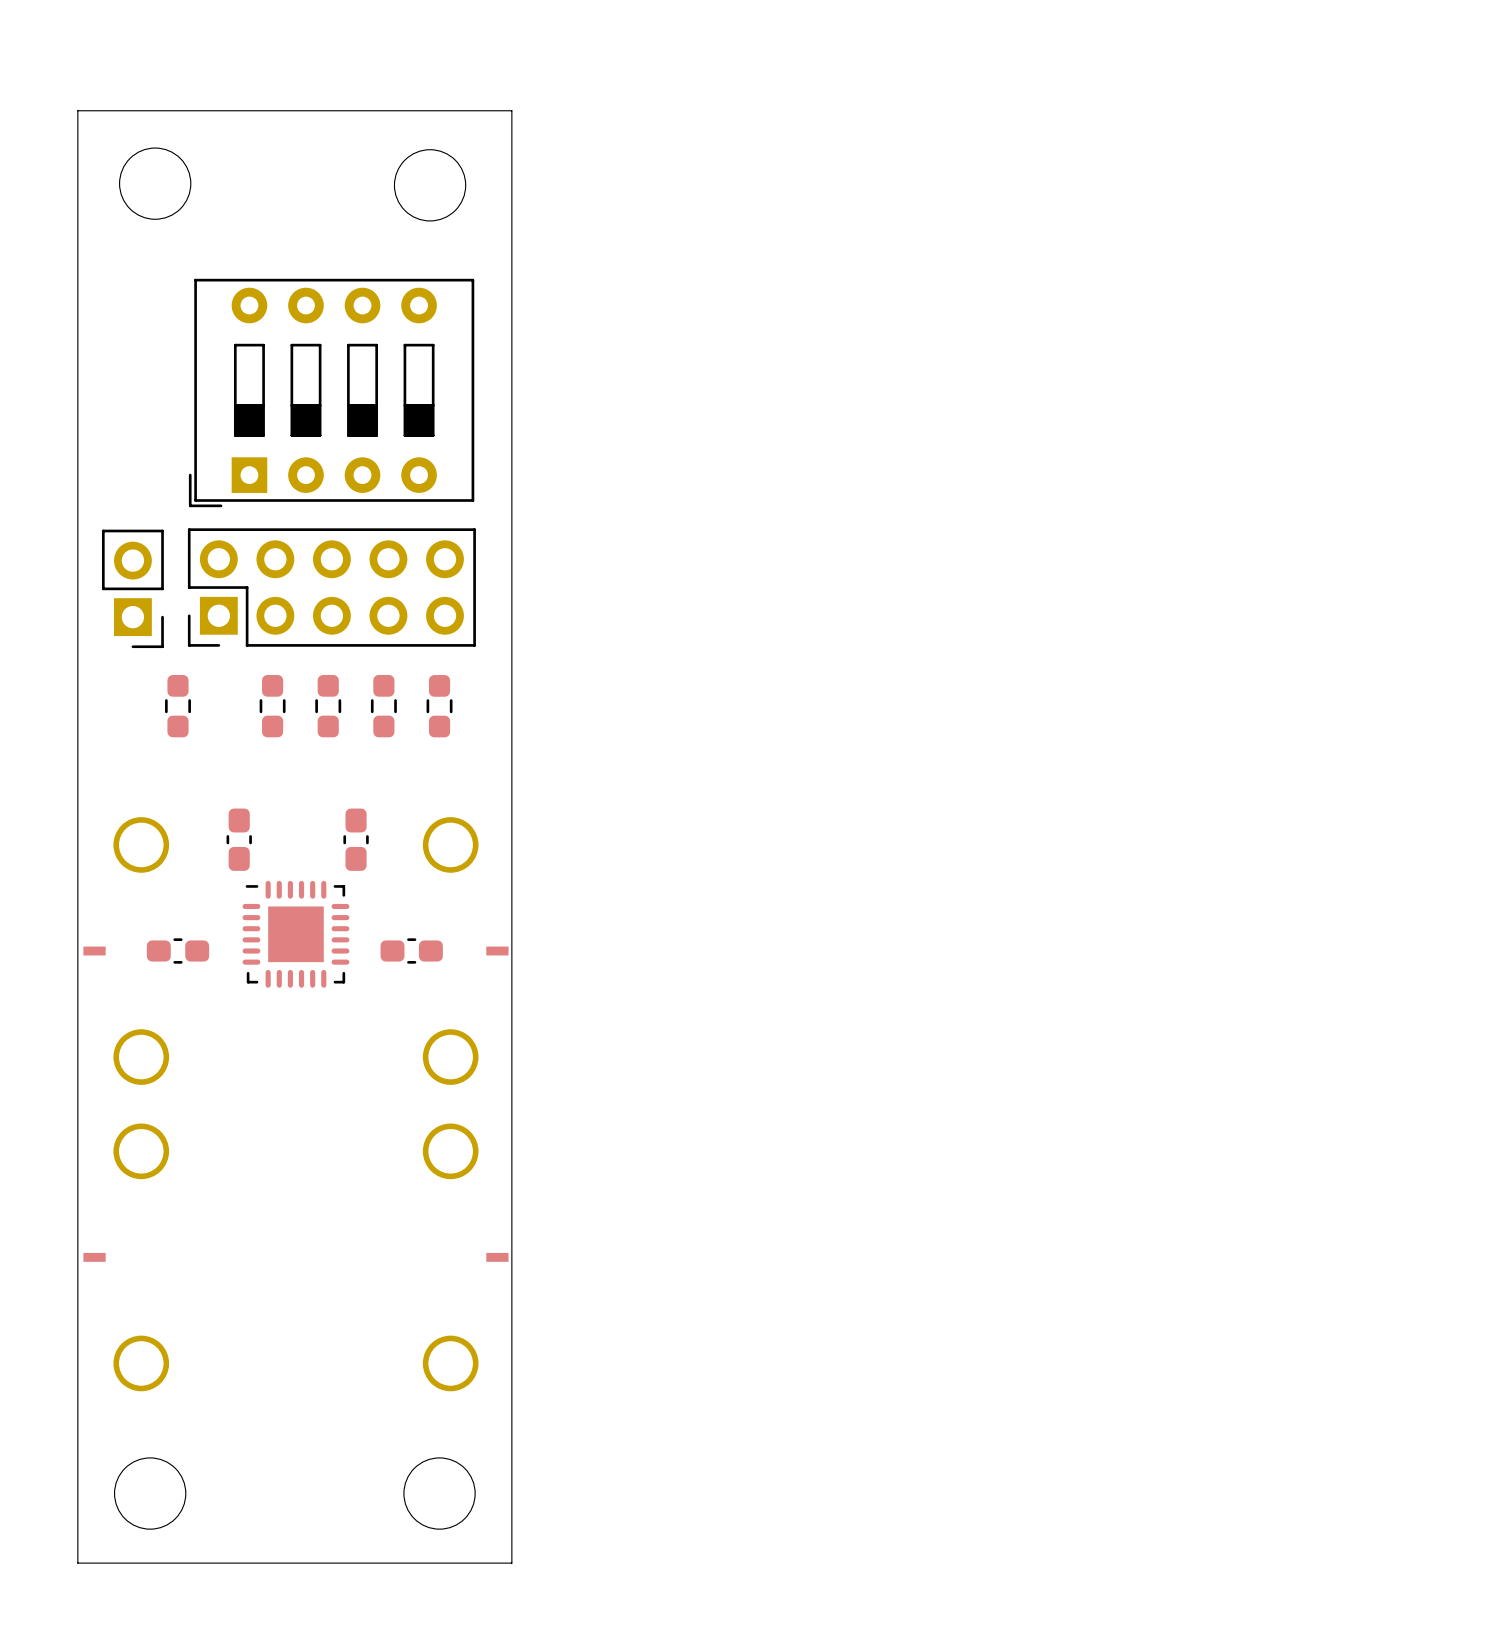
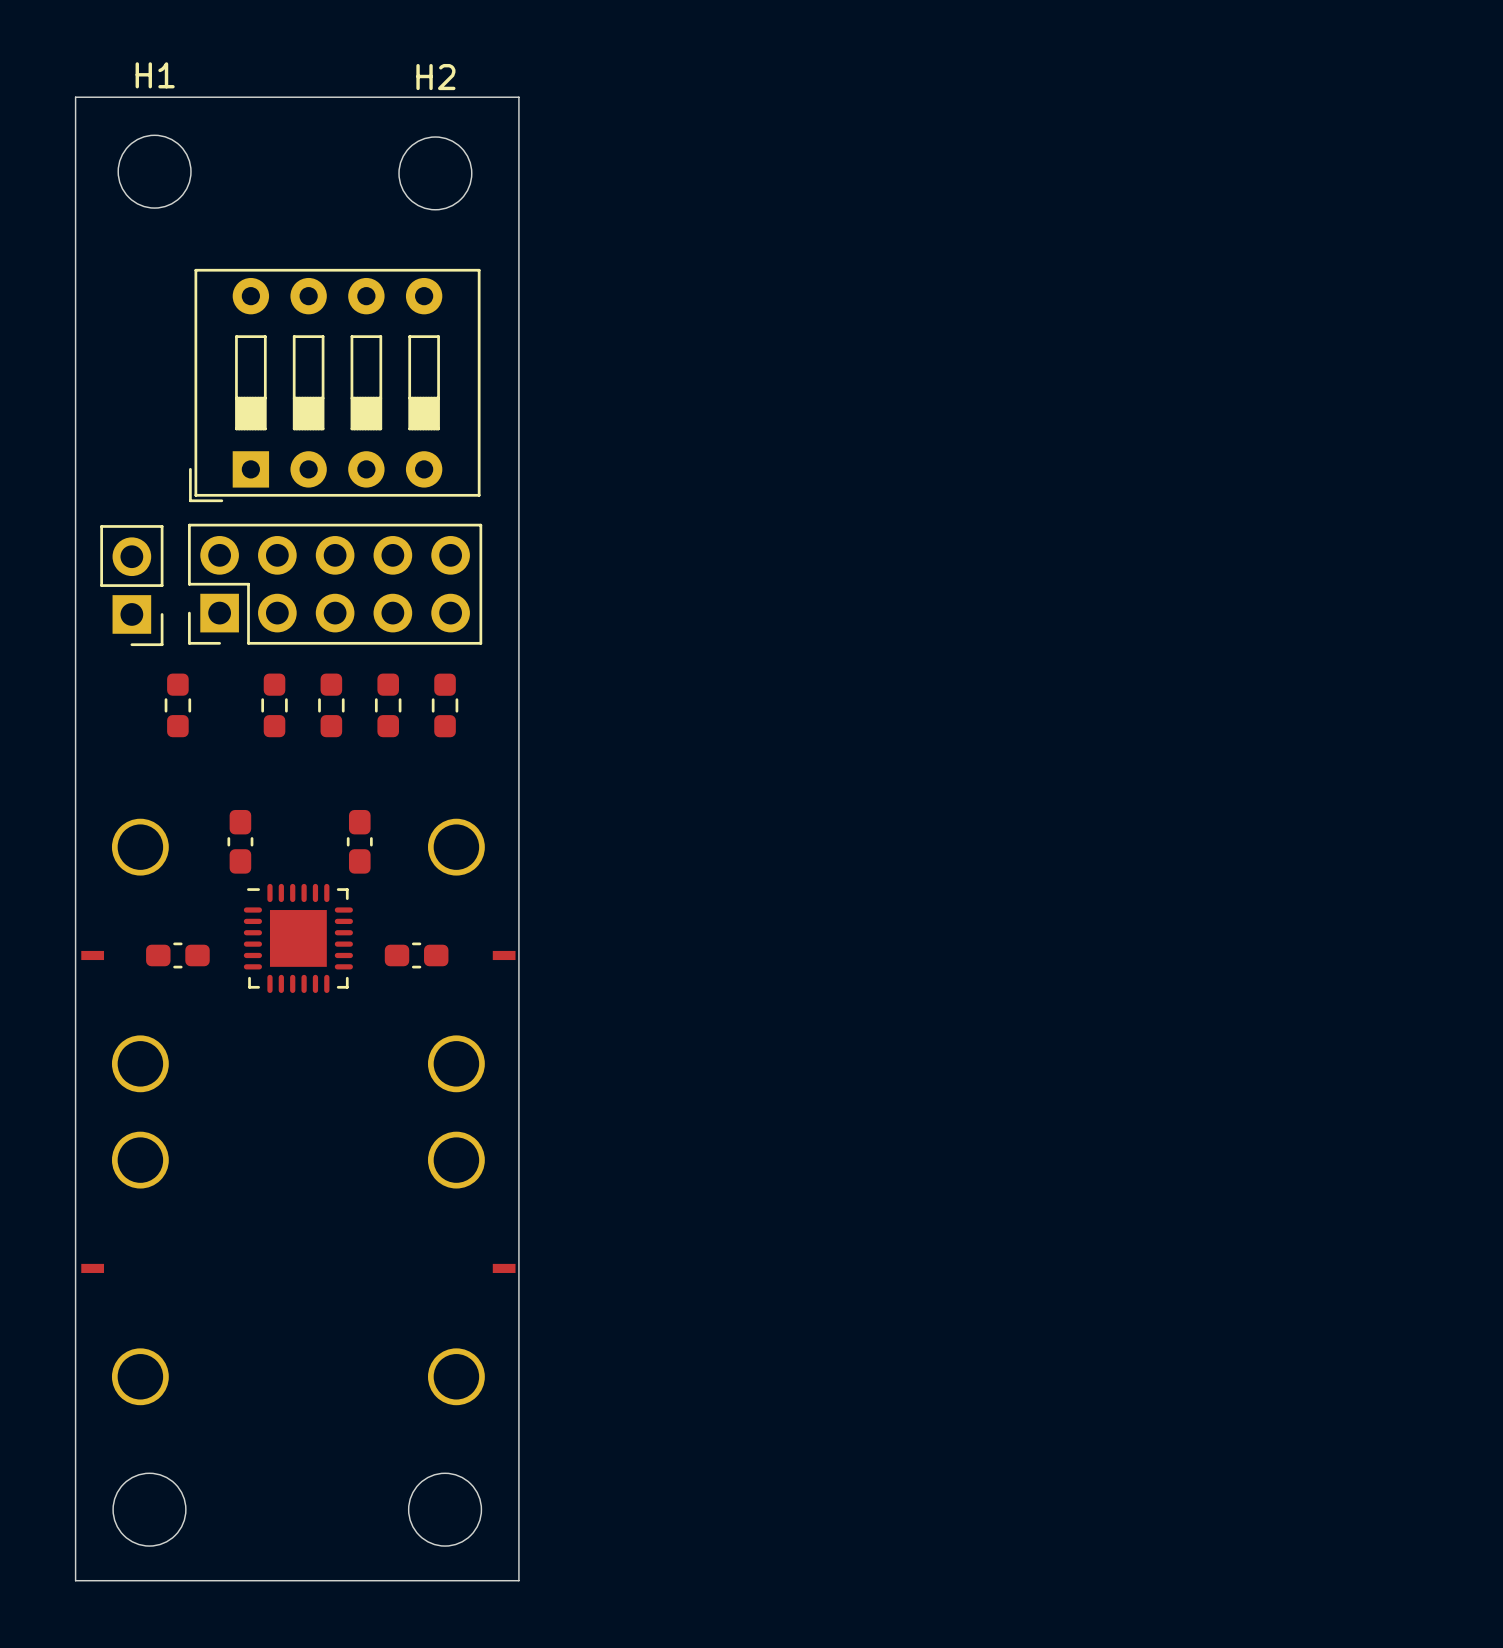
H1 name: none -> H1 (155, 75)
H2 name: none -> H2 (435, 77)

